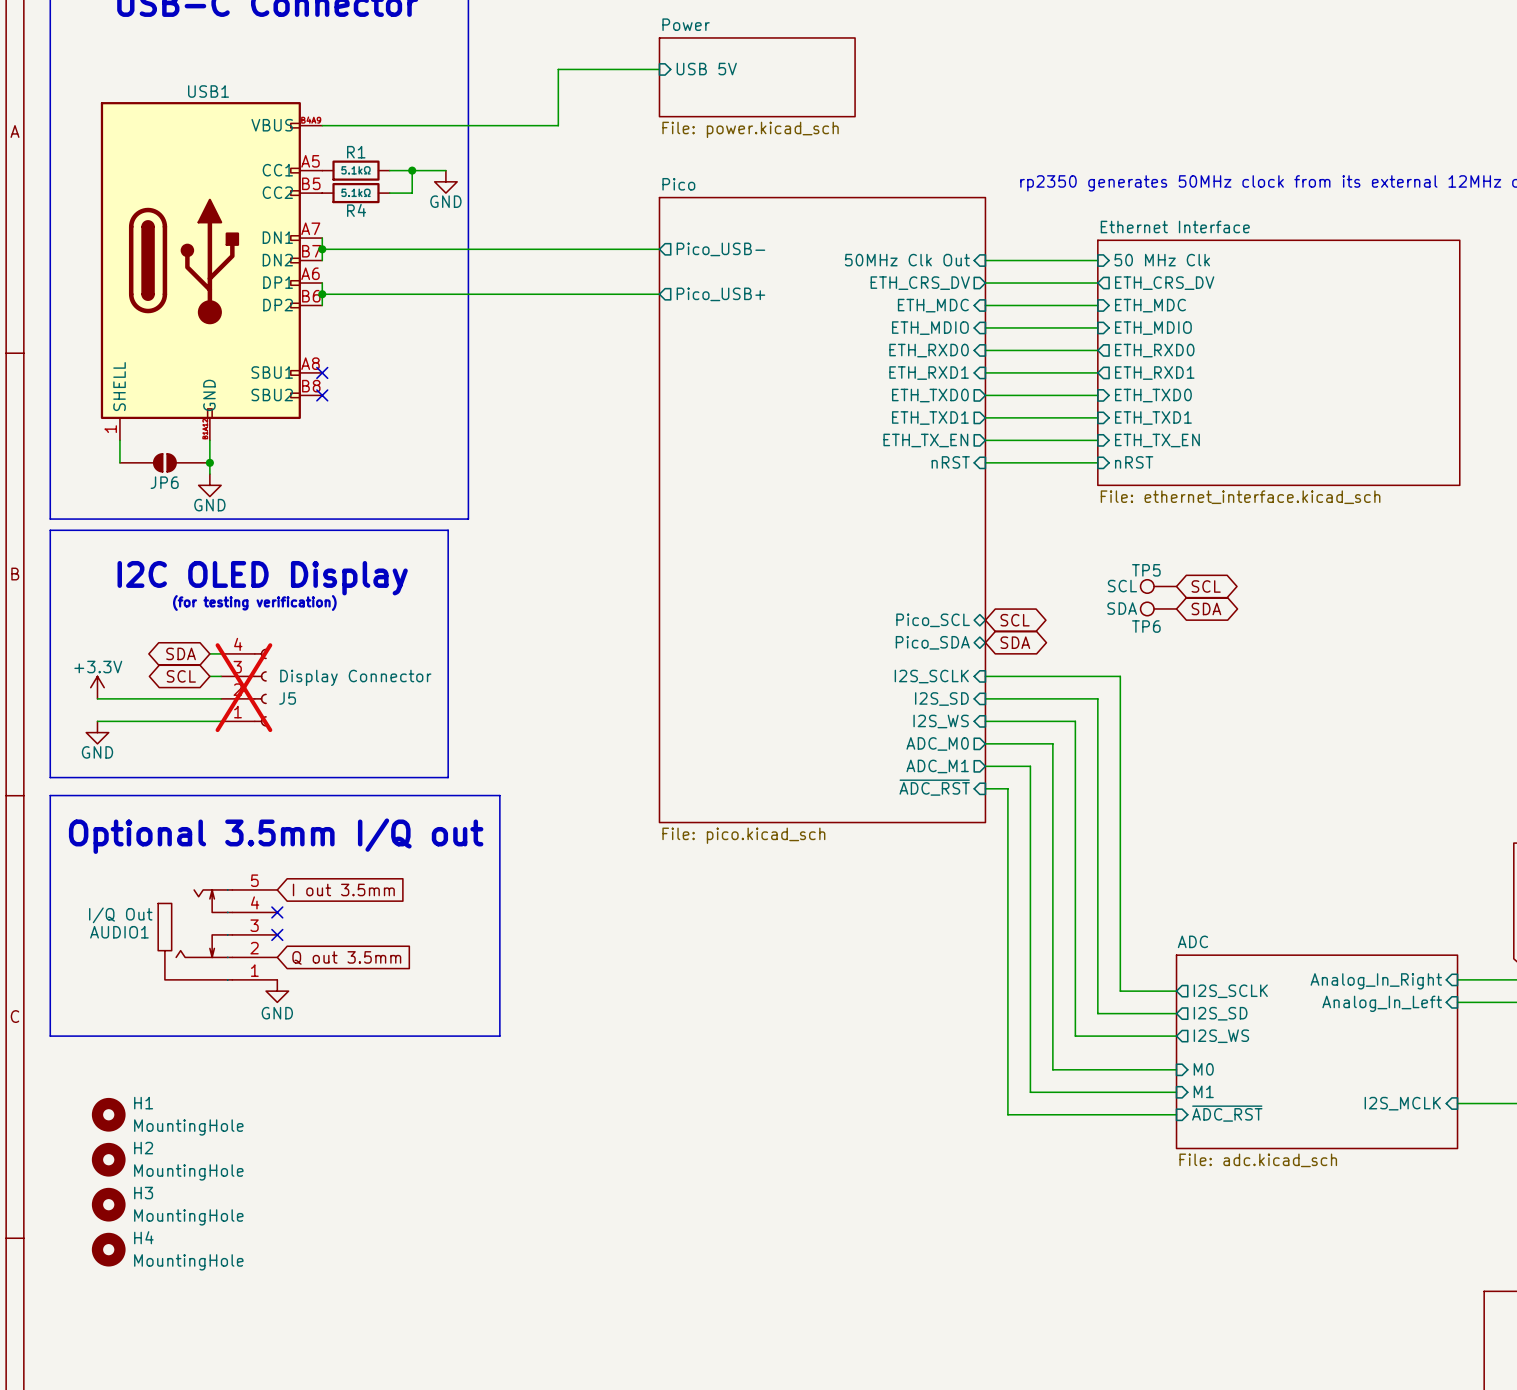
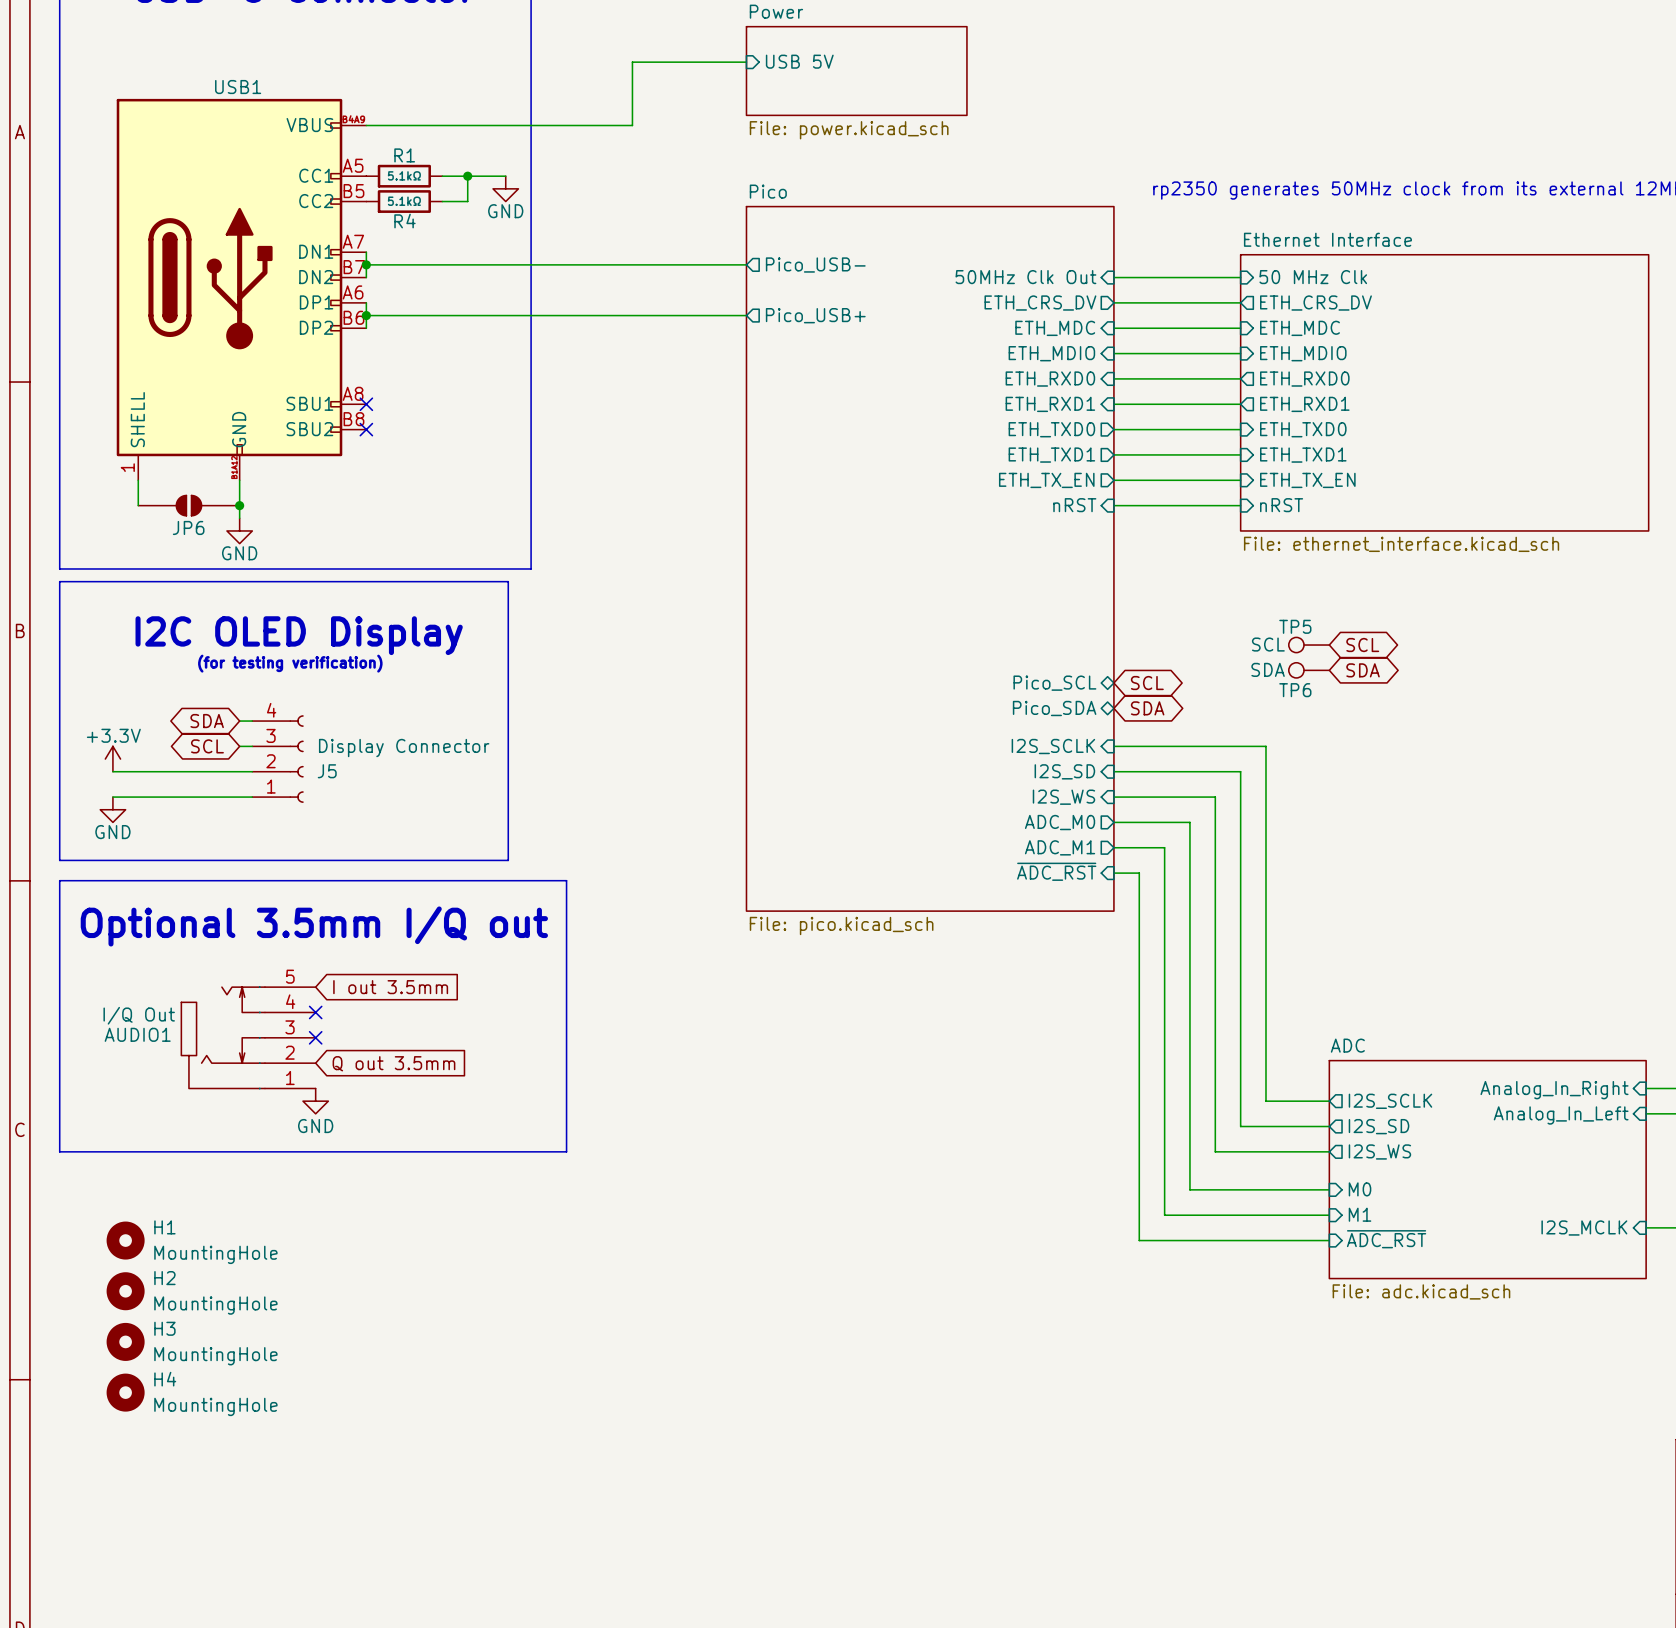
J5 do-not-place cross: (243, 687) -> none

